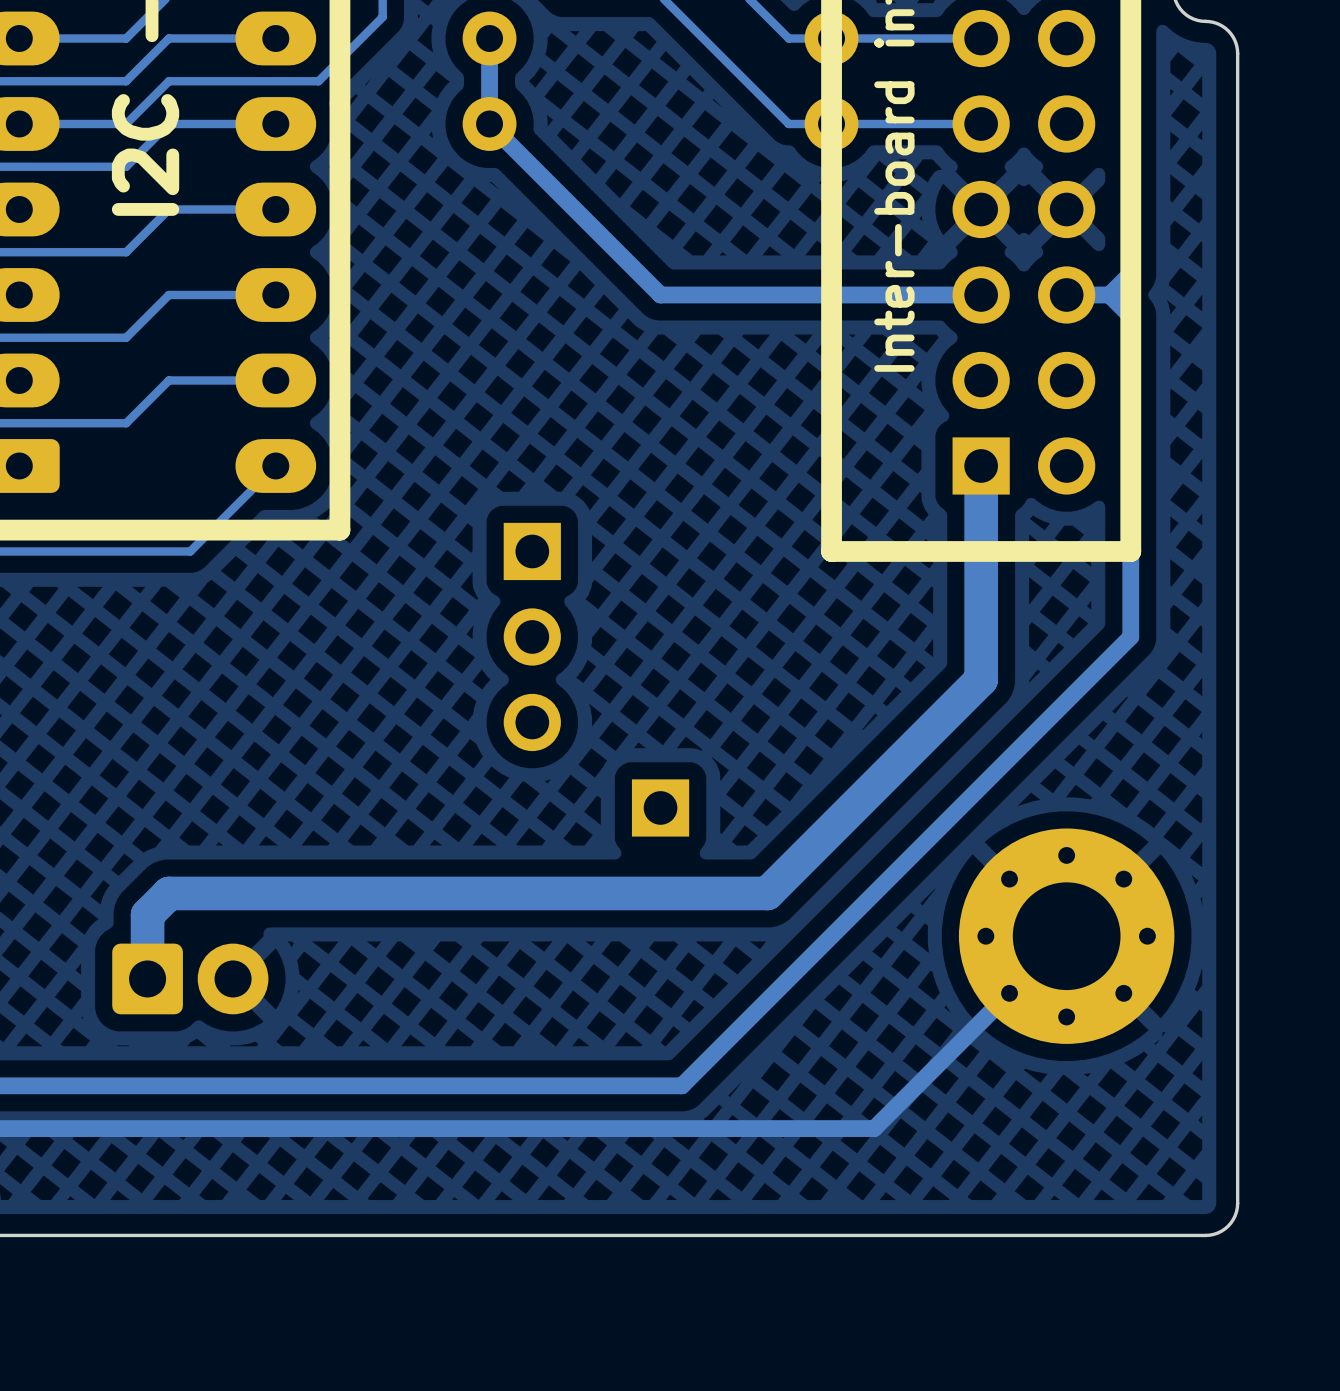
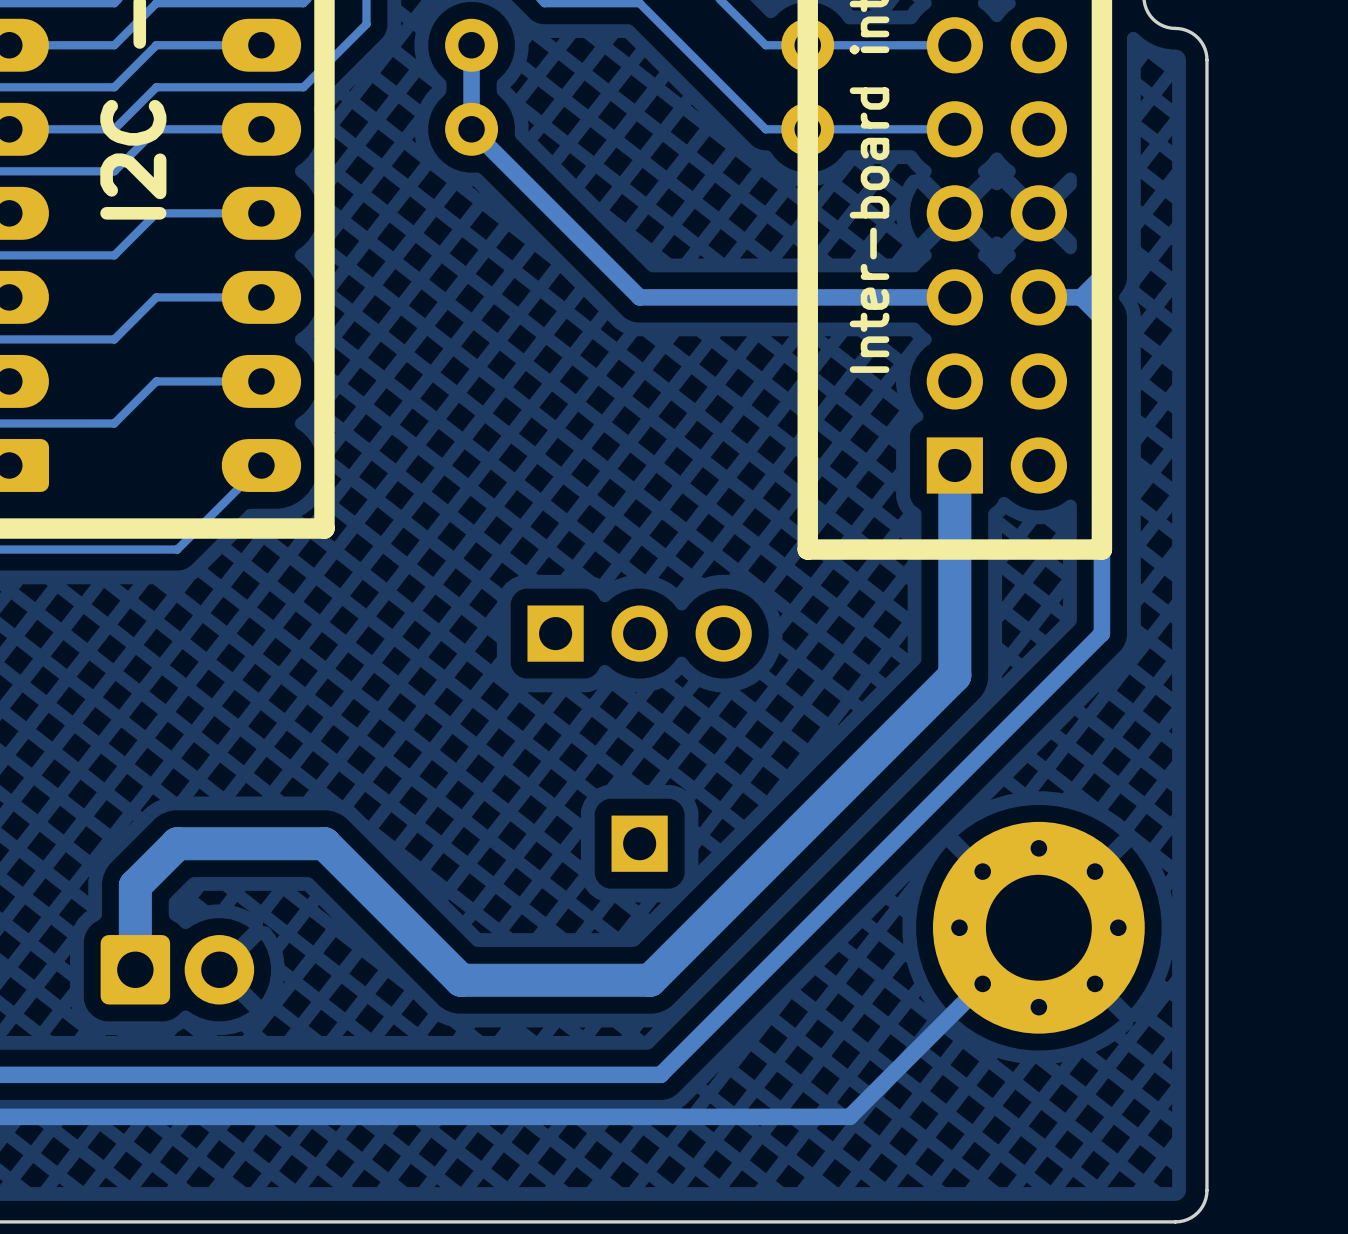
part rotation: 0° (532, 636) -> 90° counterclockwise (639, 633)
part position: (660, 807) -> (639, 843)
track: (767, 893) (168, 893) (147, 914) -> (744, 885) (650, 980) (461, 980) (324, 843) (177, 843) (135, 885) (135, 906)

